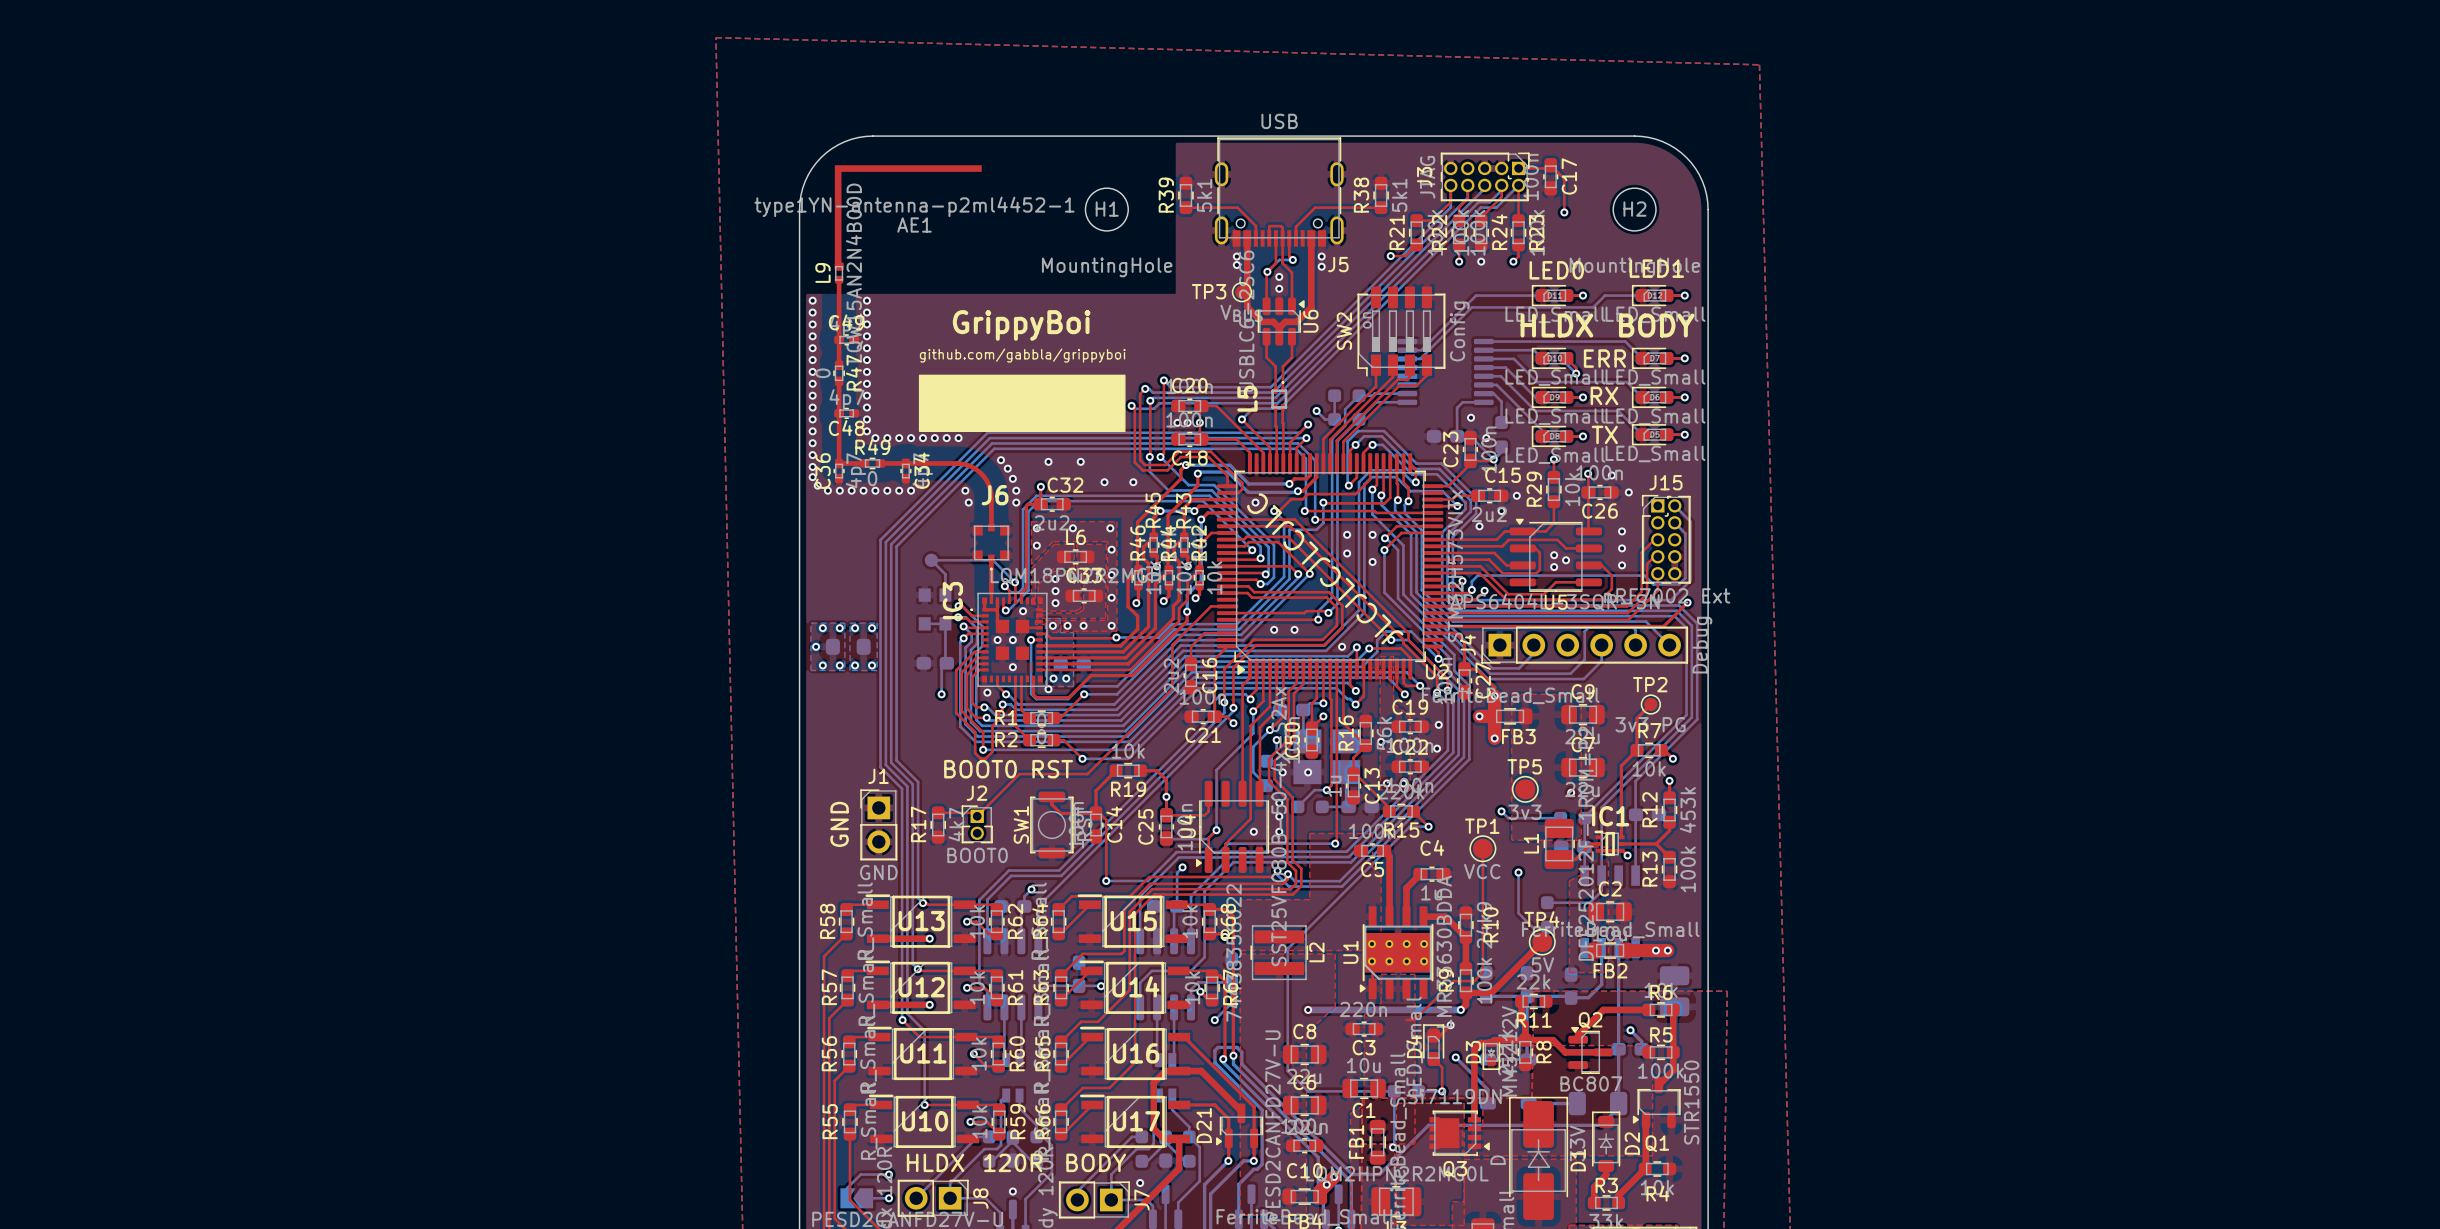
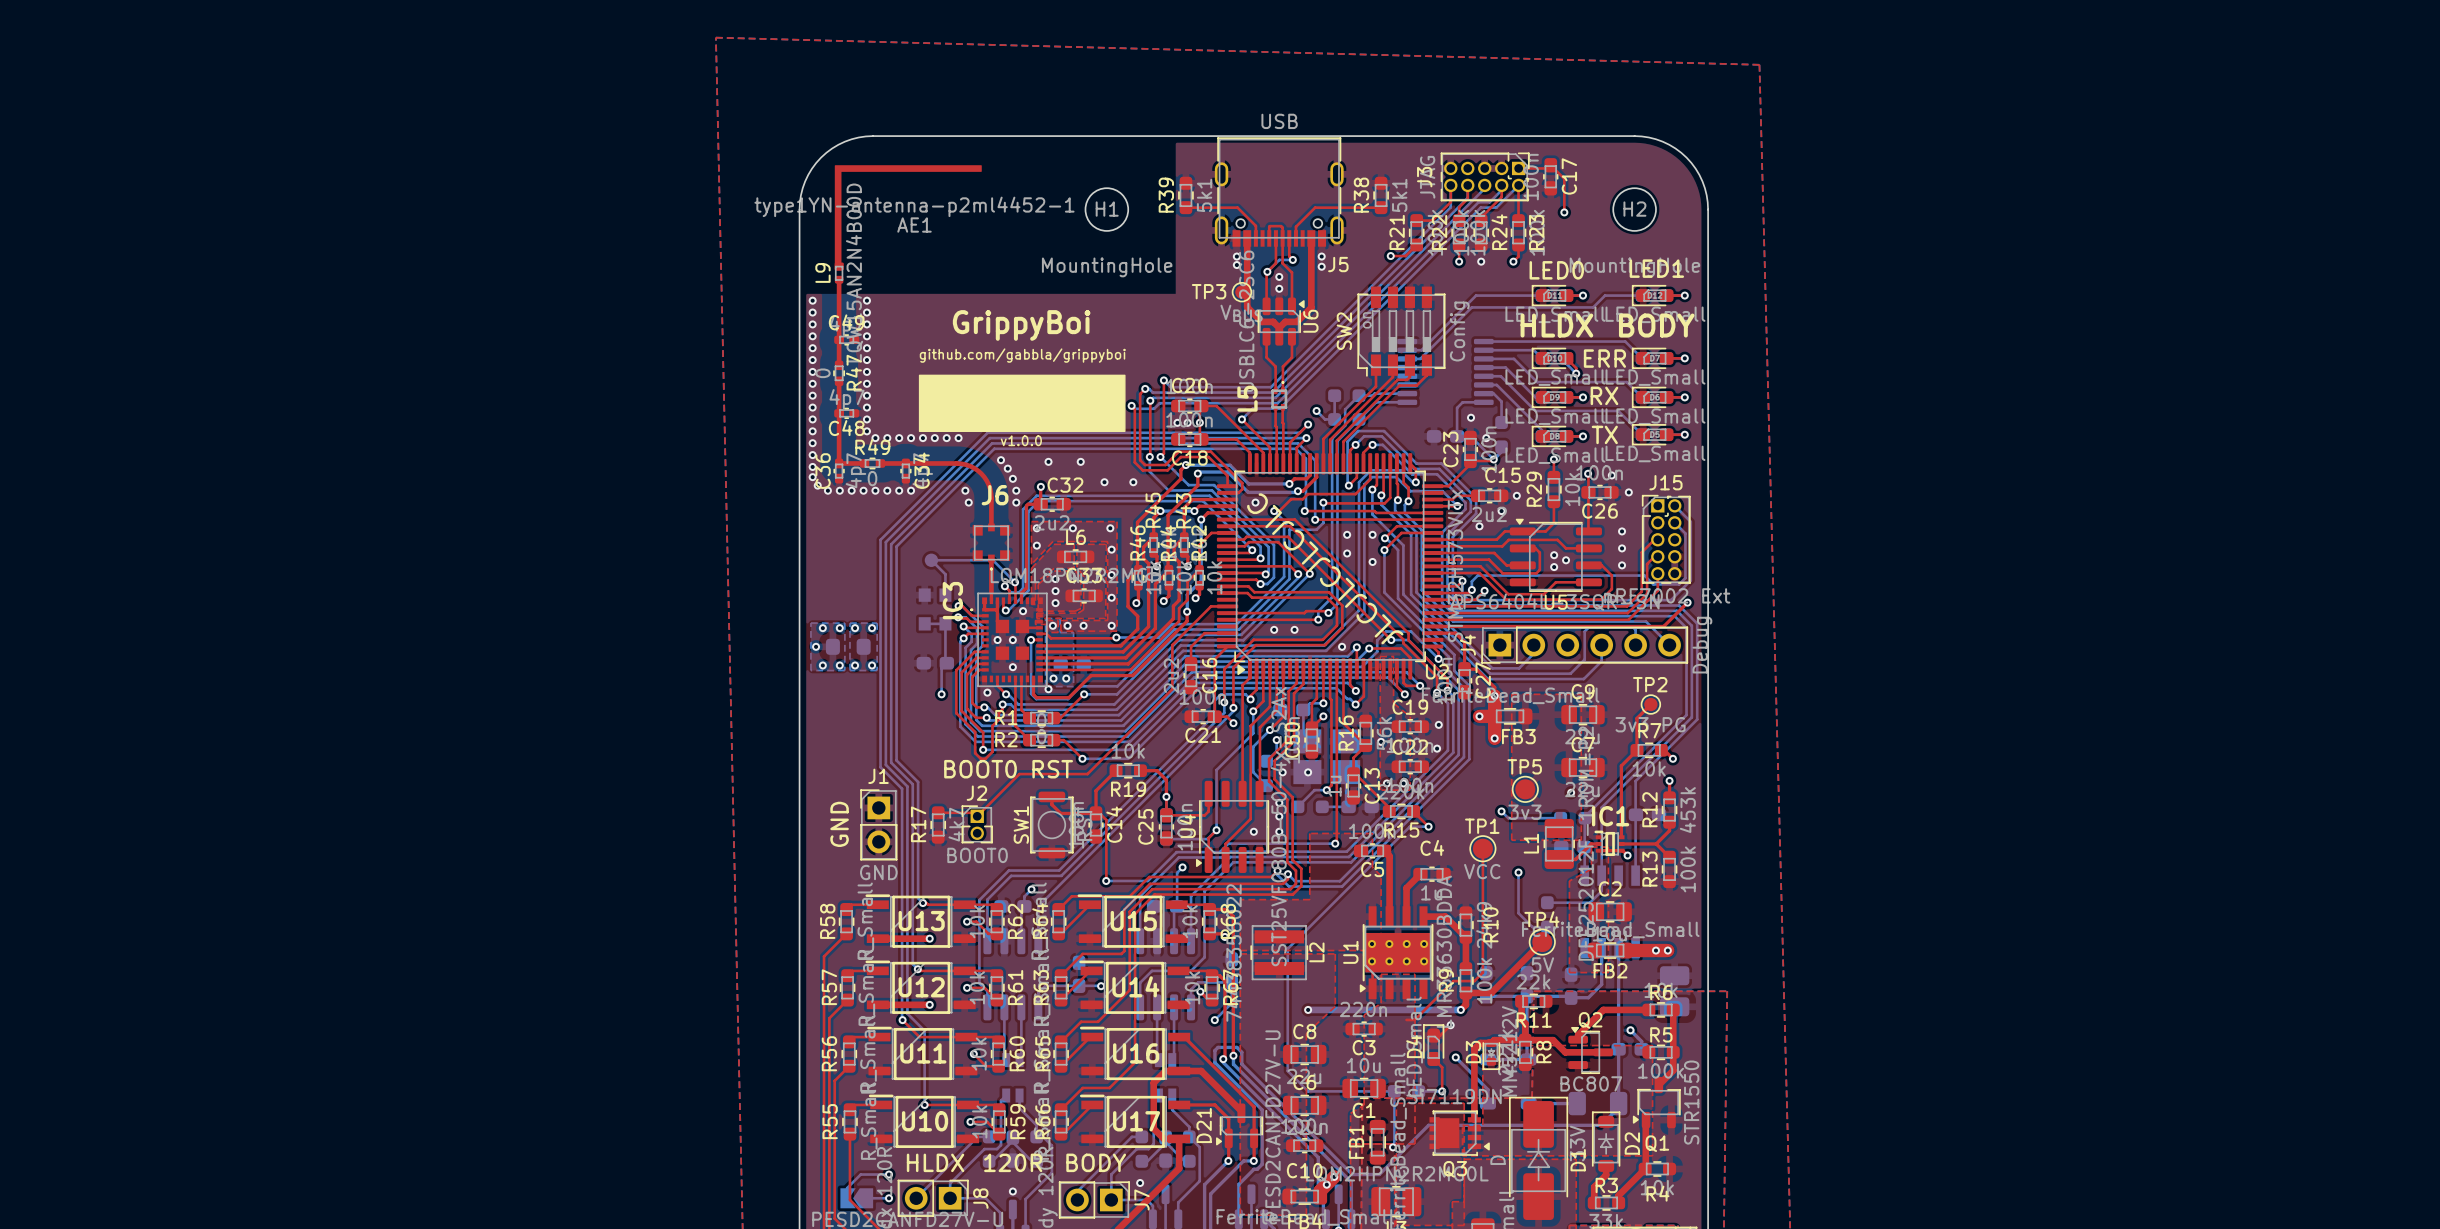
text: none -> v1.0.0 (1021, 440)

